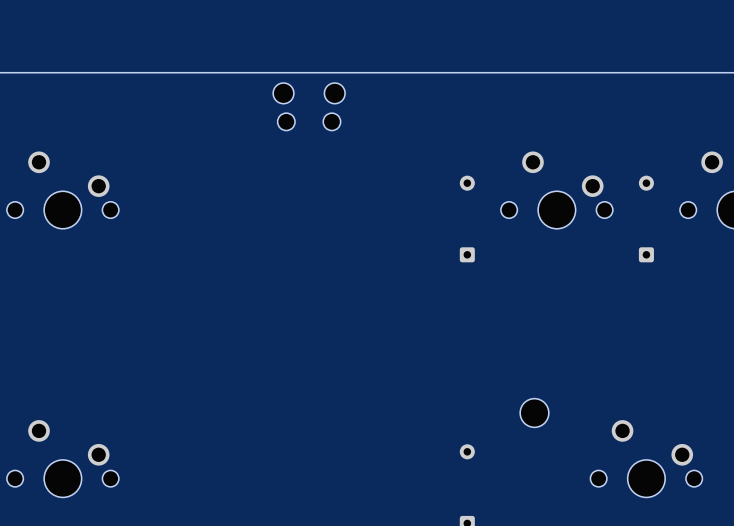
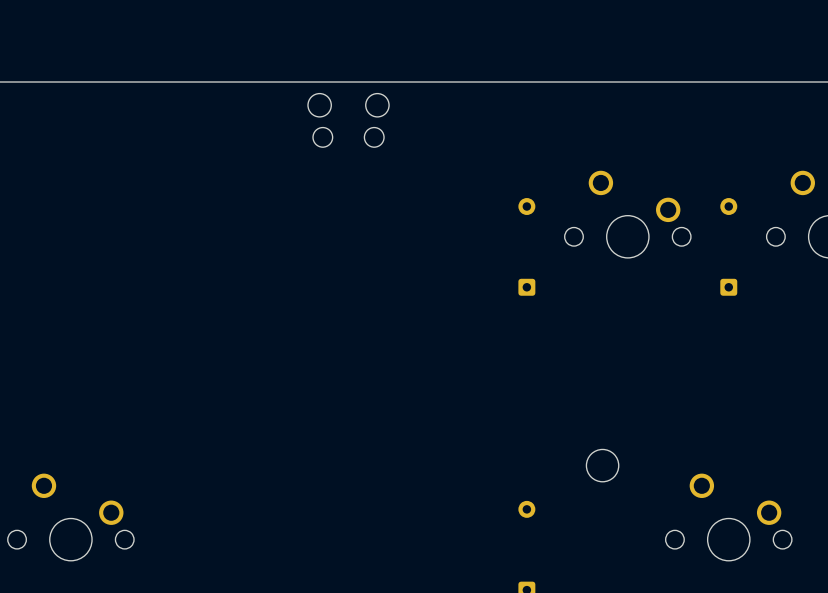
part: (62, 190) -> none

